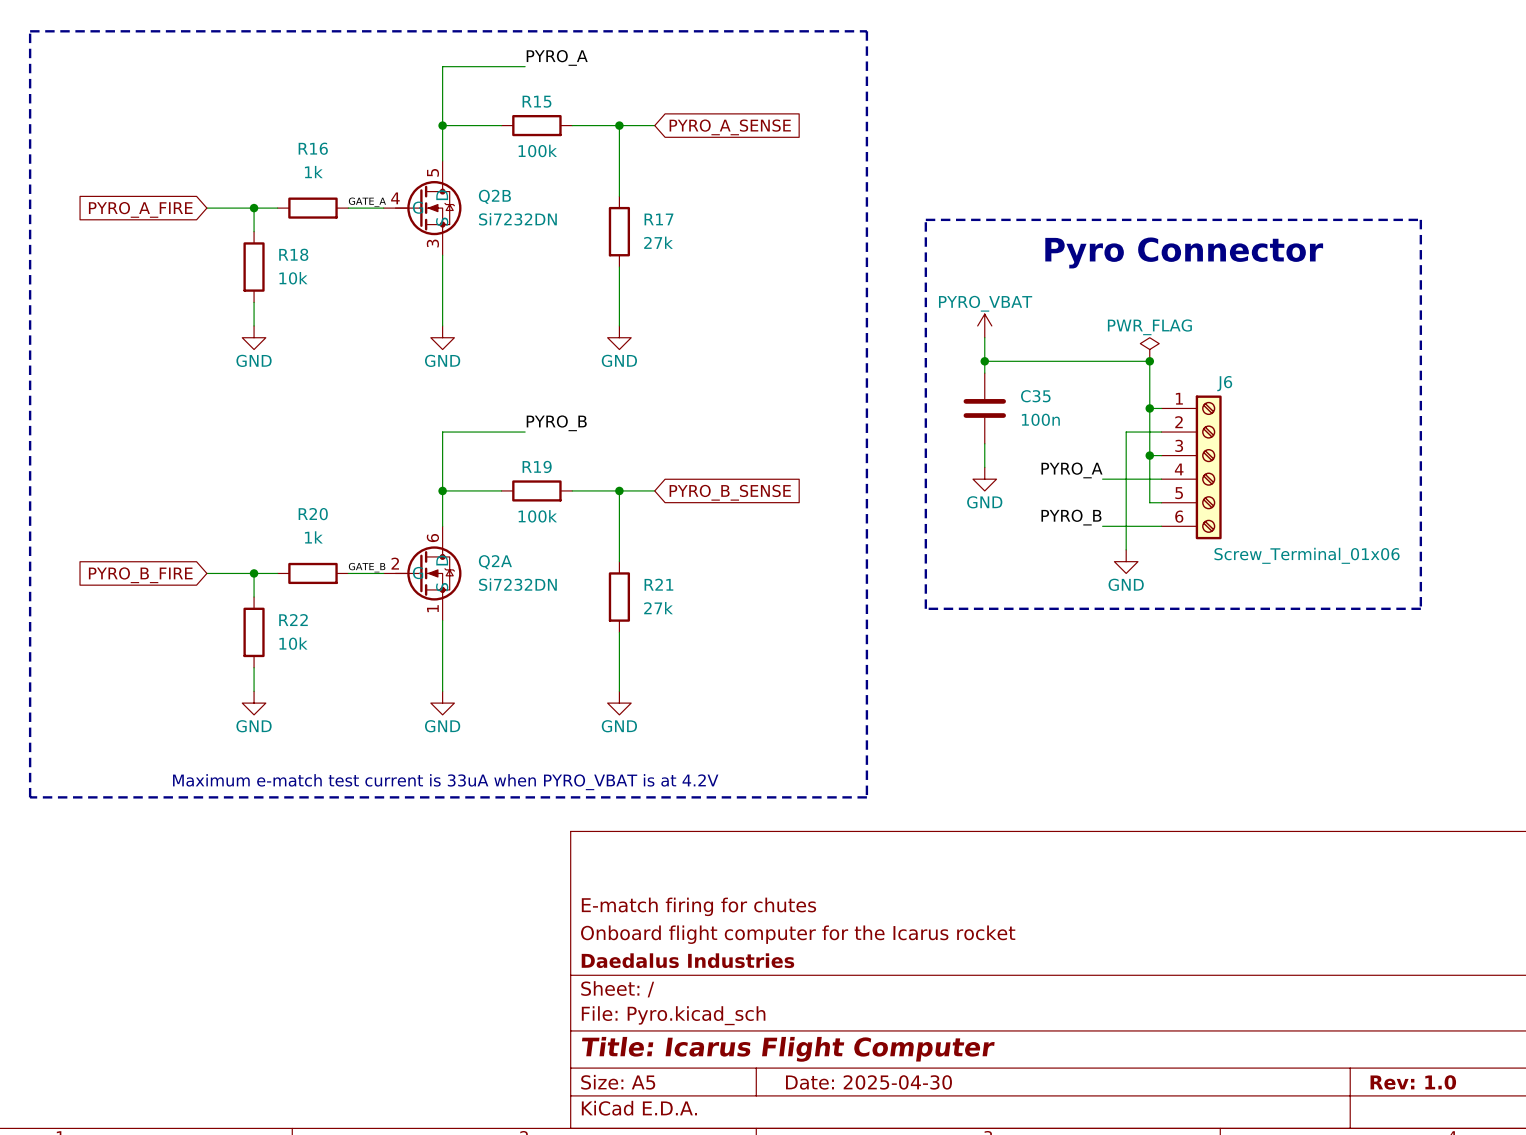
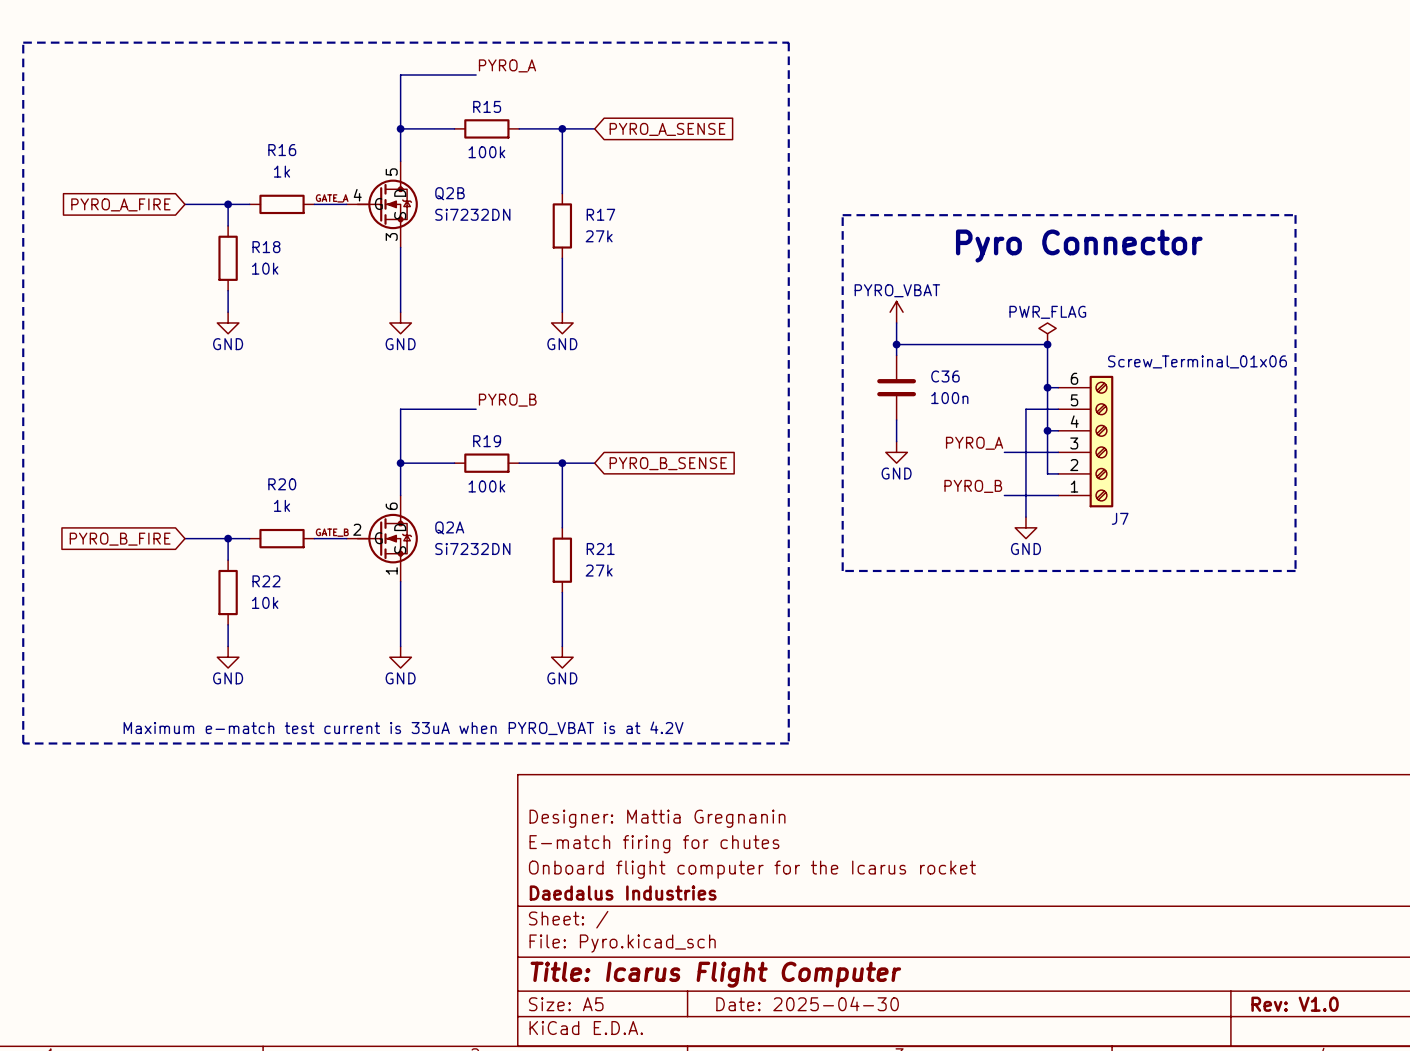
C35 name: C35 (1035, 396) -> C36 (945, 376)
J6: Screw_Terminal_01x06 (1191, 467) -> none
J7: none -> Screw_Terminal_01x06 (1085, 441)
title block: none -> Designer: Mattia Gregnanin (657, 818)
title block: Rev: 1.0 (1413, 1082) -> Rev: V1.0 (1295, 1004)

